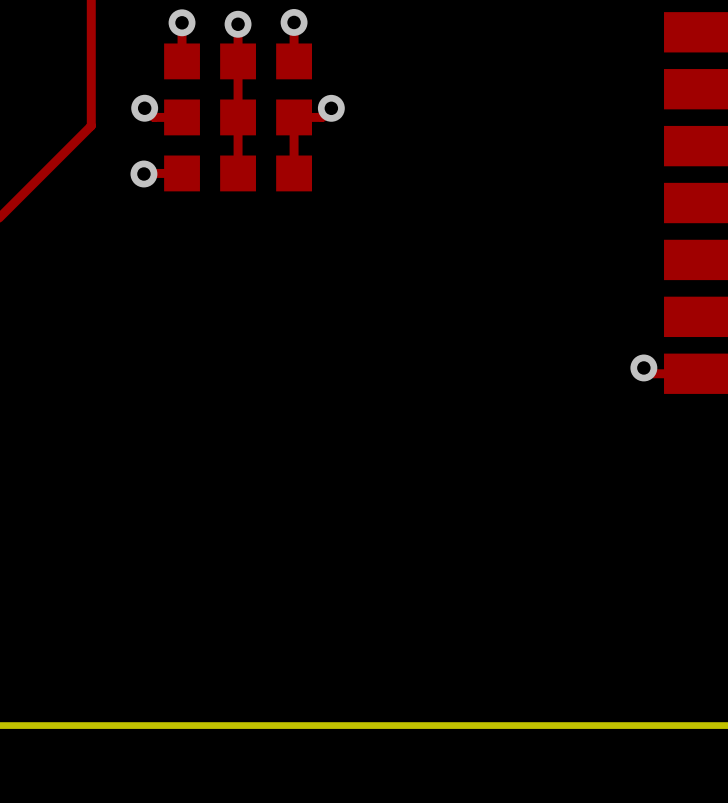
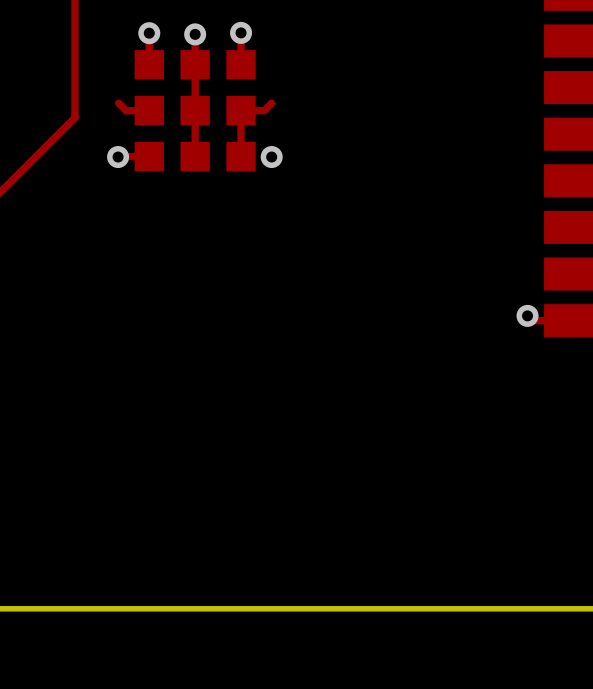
via: (144, 108) -> none
via position: (331, 108) -> (271, 157)

